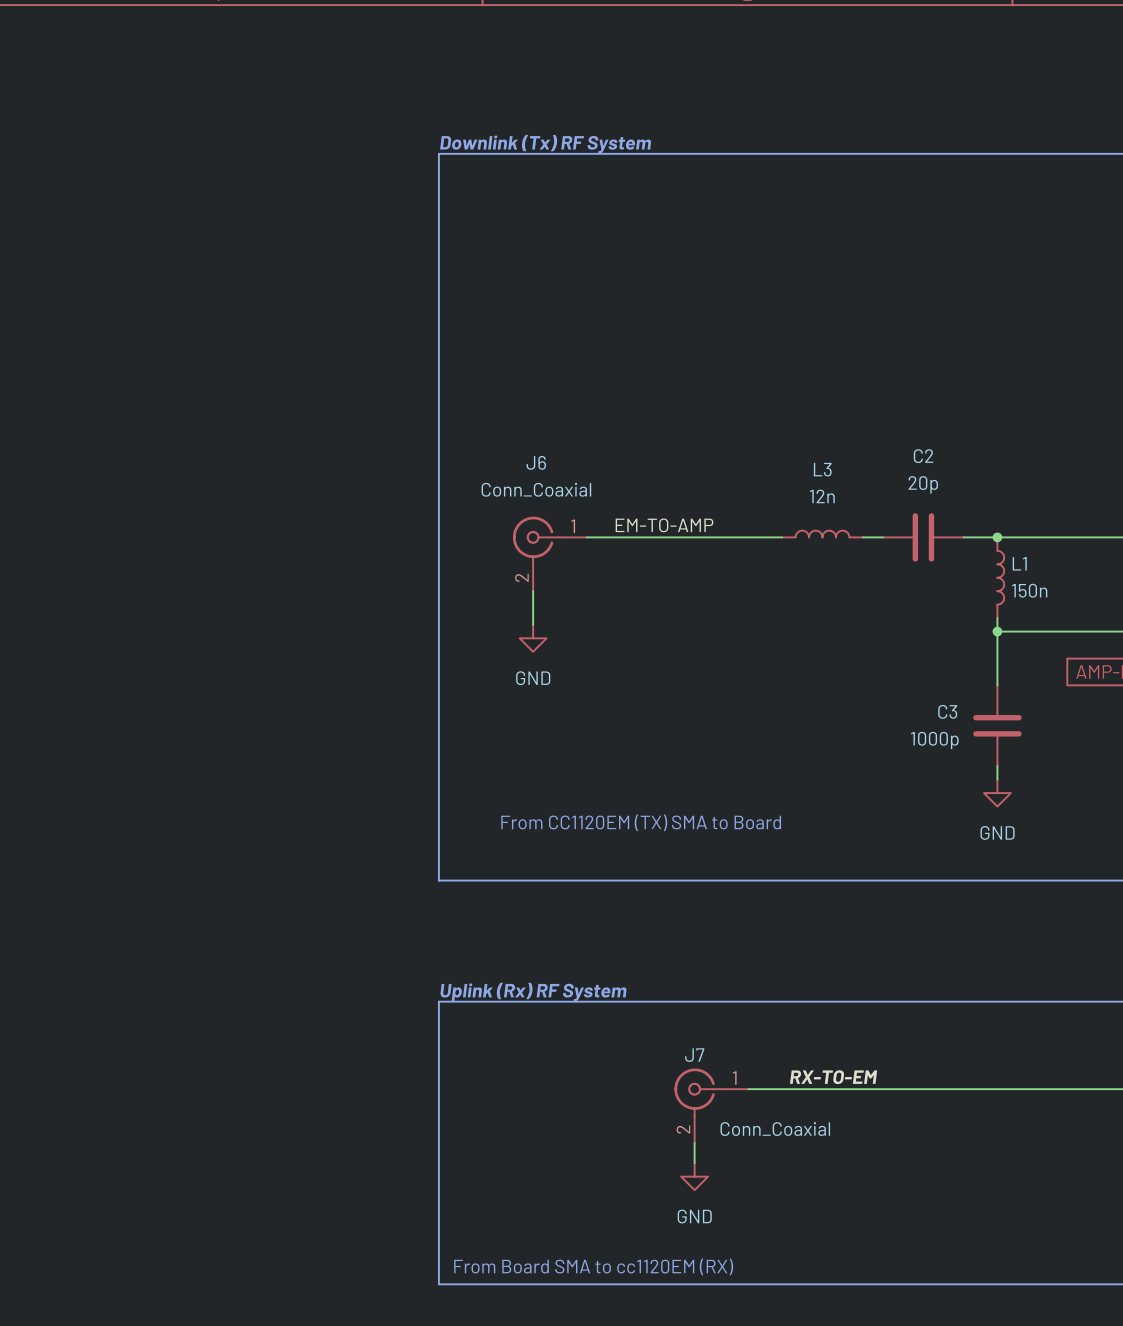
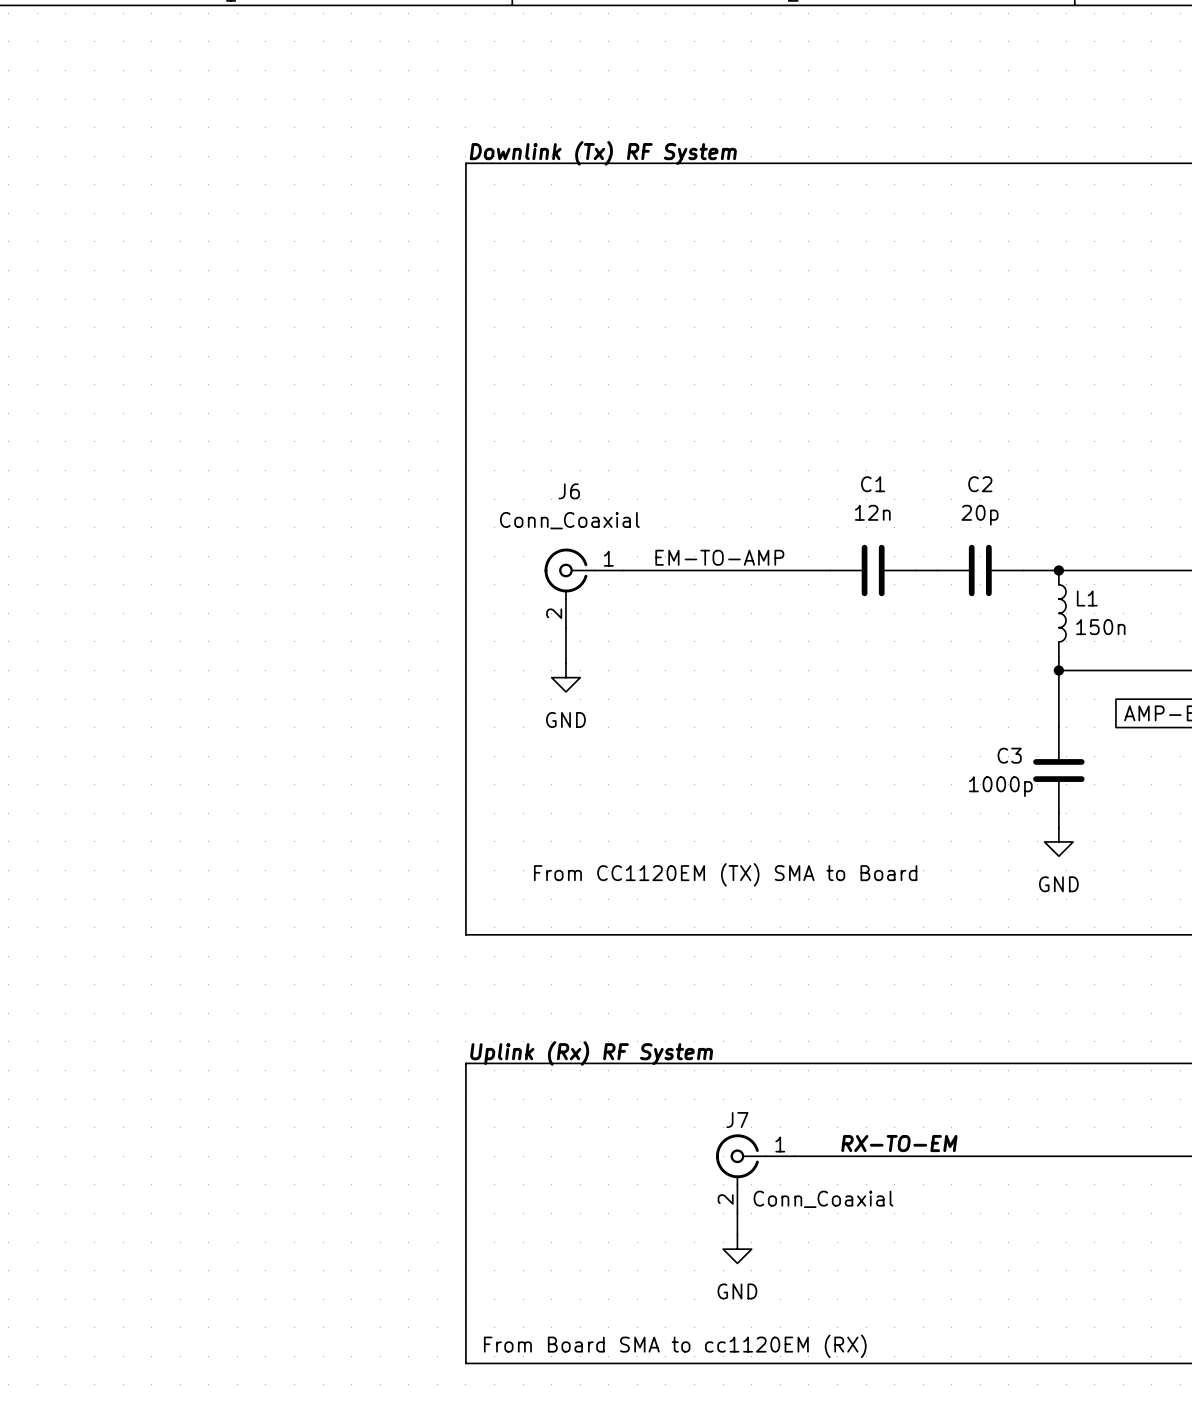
L3: 12n (822, 534) -> none
C1: none -> 12n (873, 570)

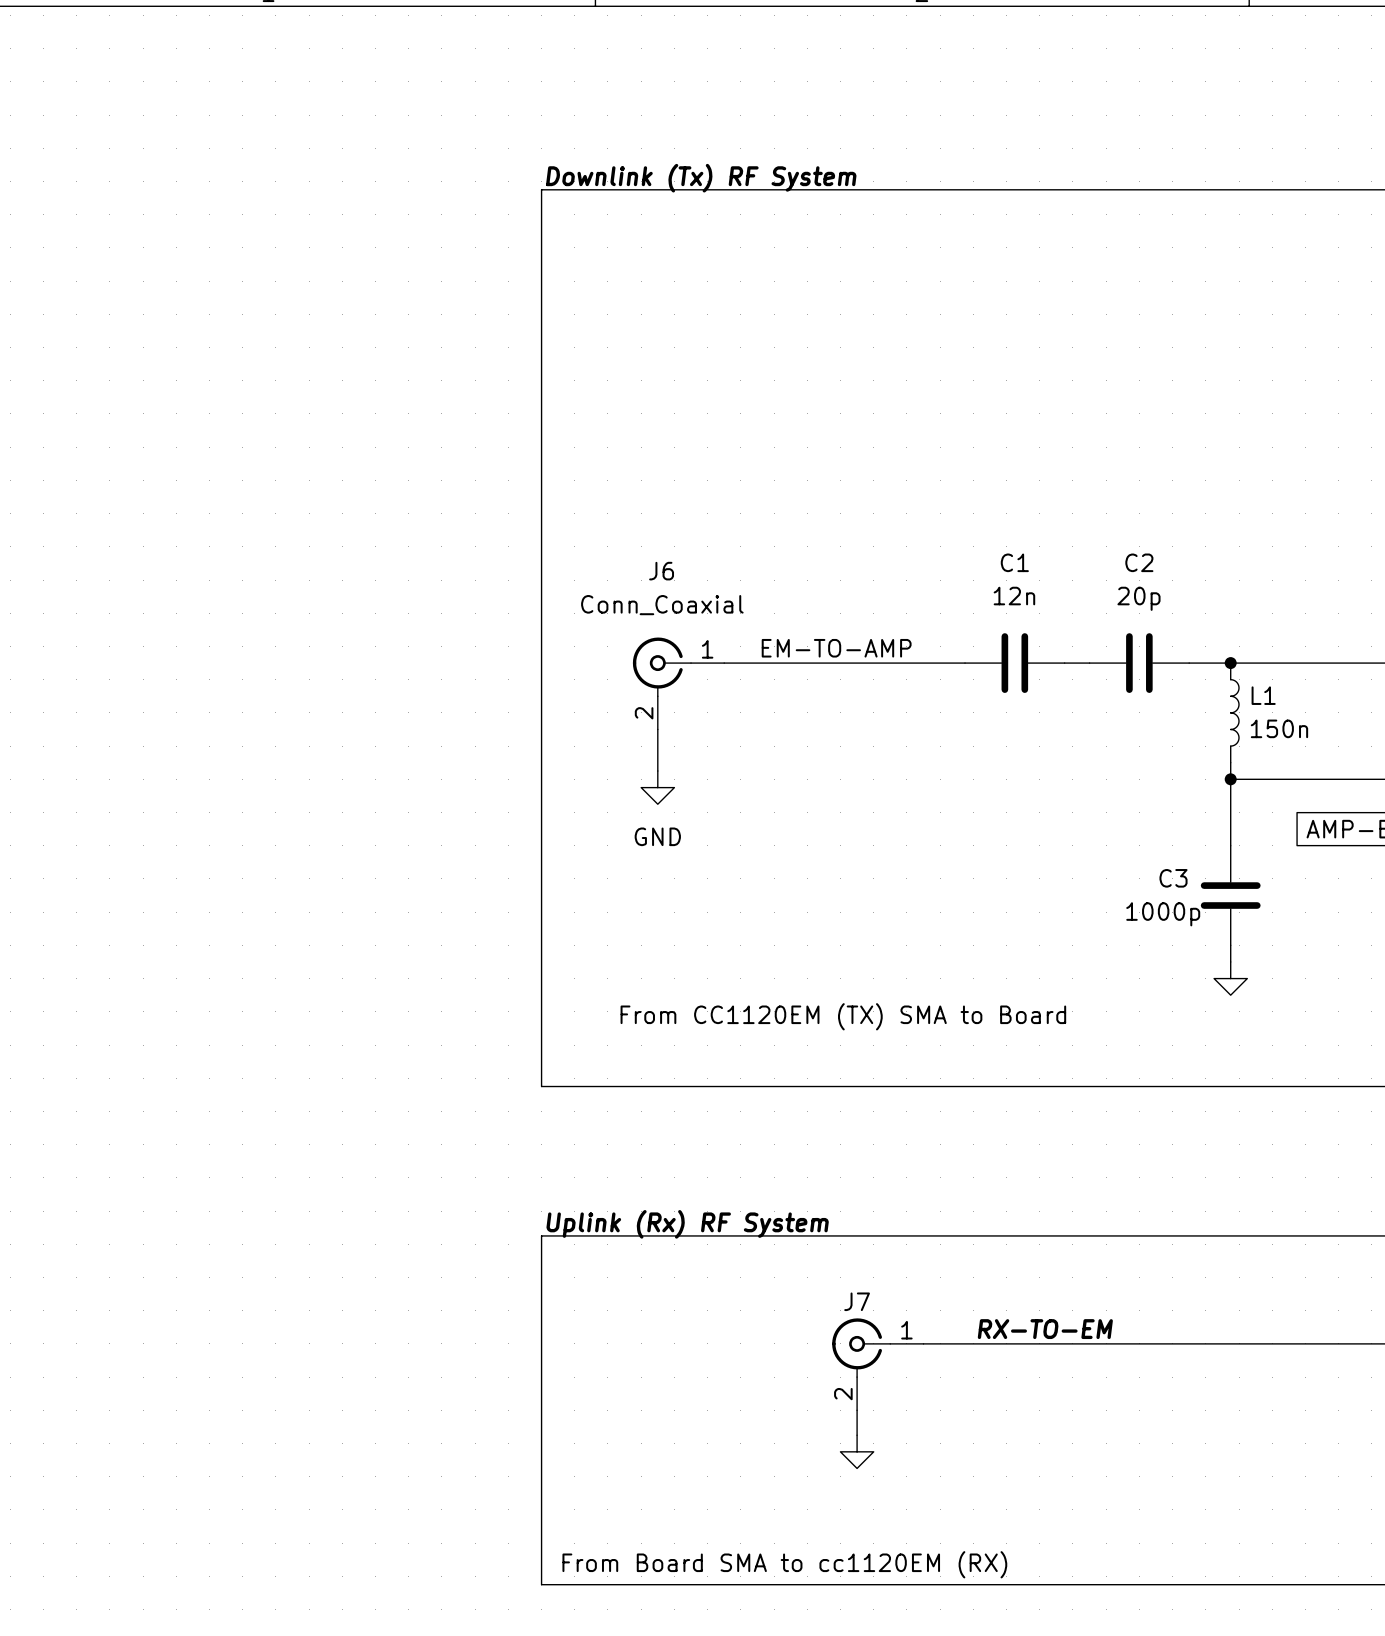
power symbol text: GND (1058, 884) -> none
J7 value: Conn_Coaxial (823, 1199) -> none
power symbol text: GND (737, 1291) -> none

